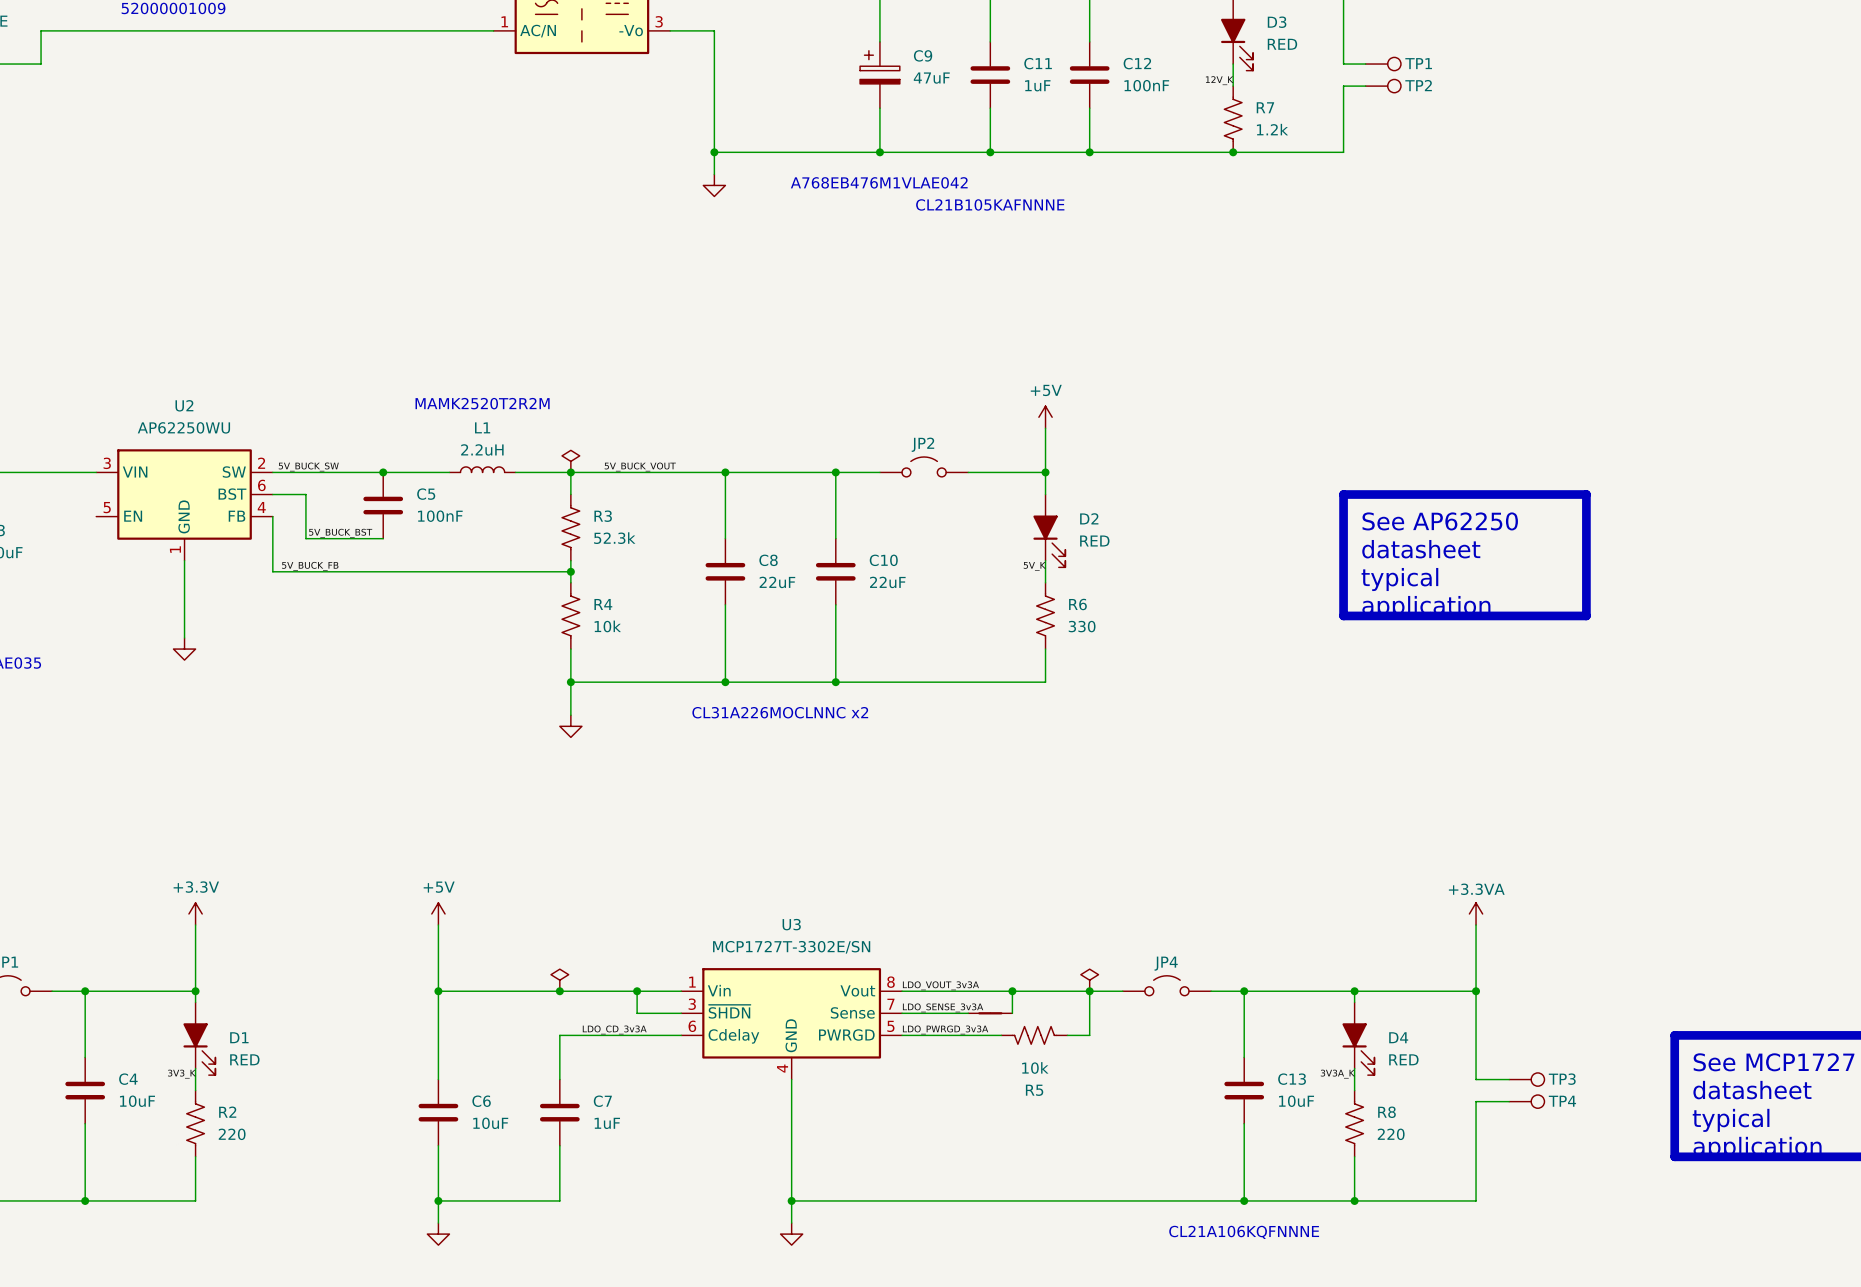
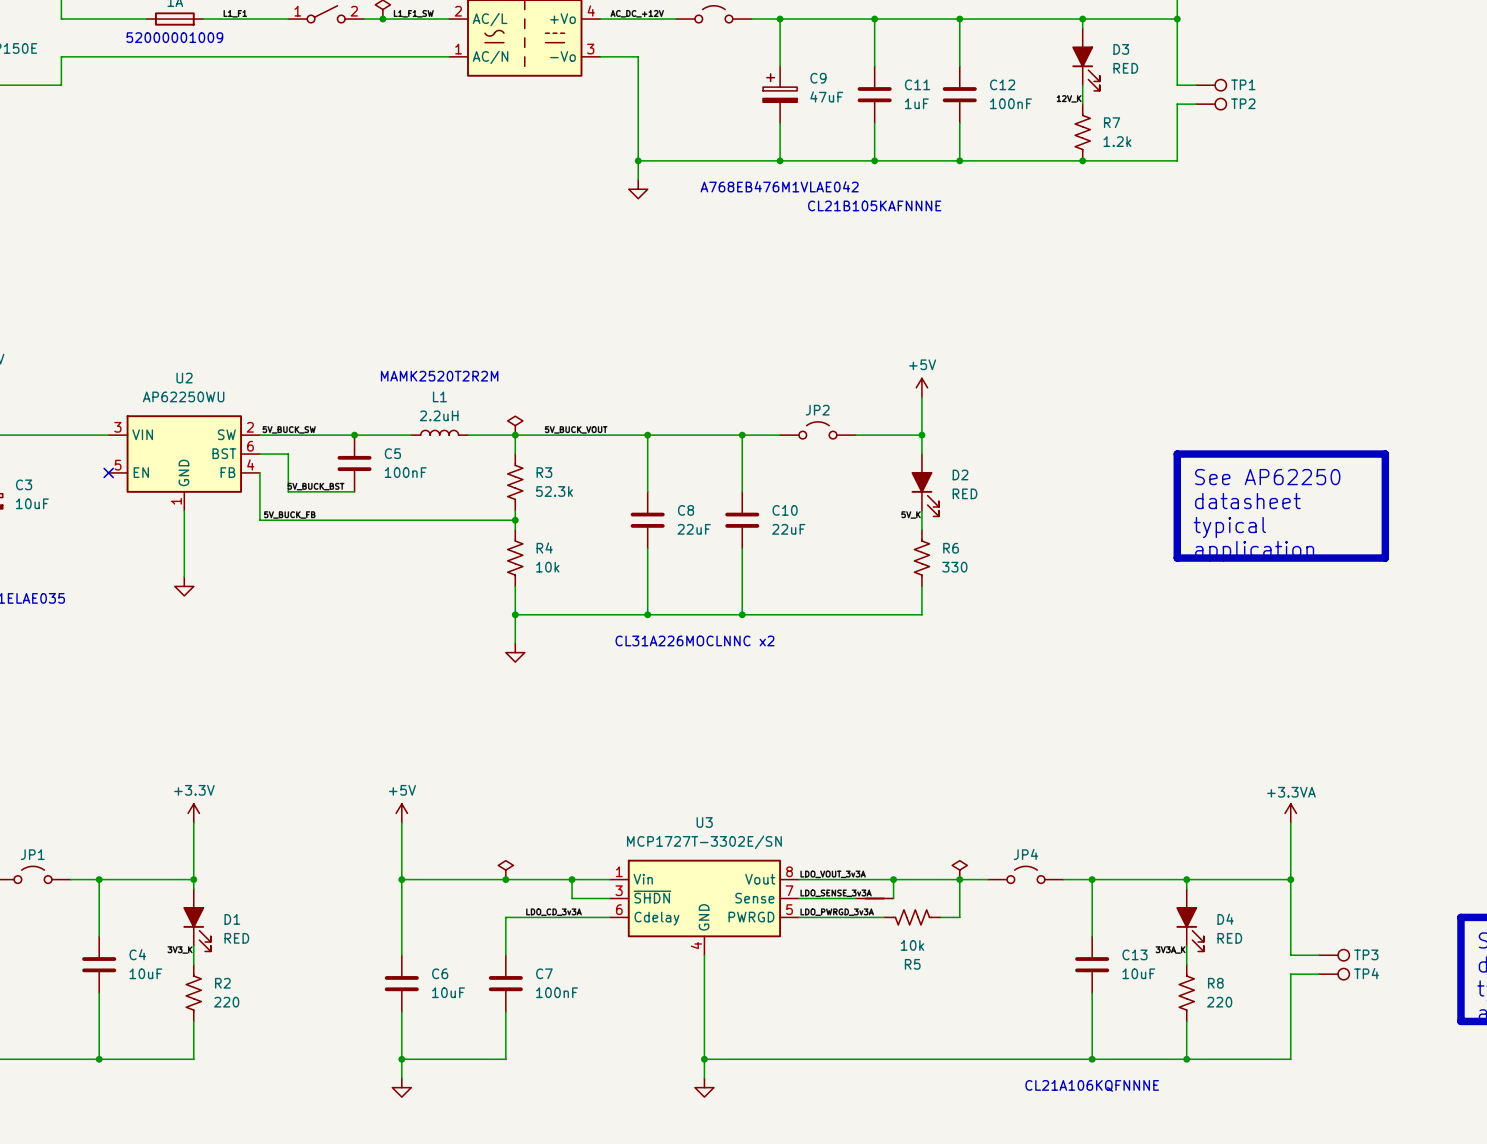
no-connect mark: none -> (108, 472)
C7 value: 1uF (607, 1123) -> 100nF (557, 992)

